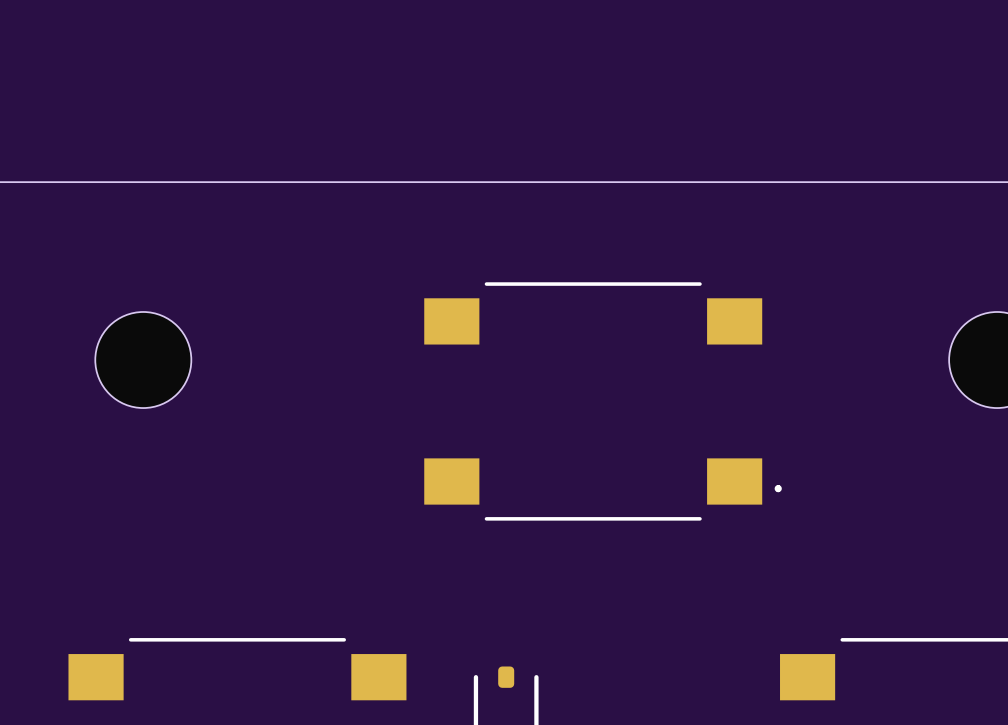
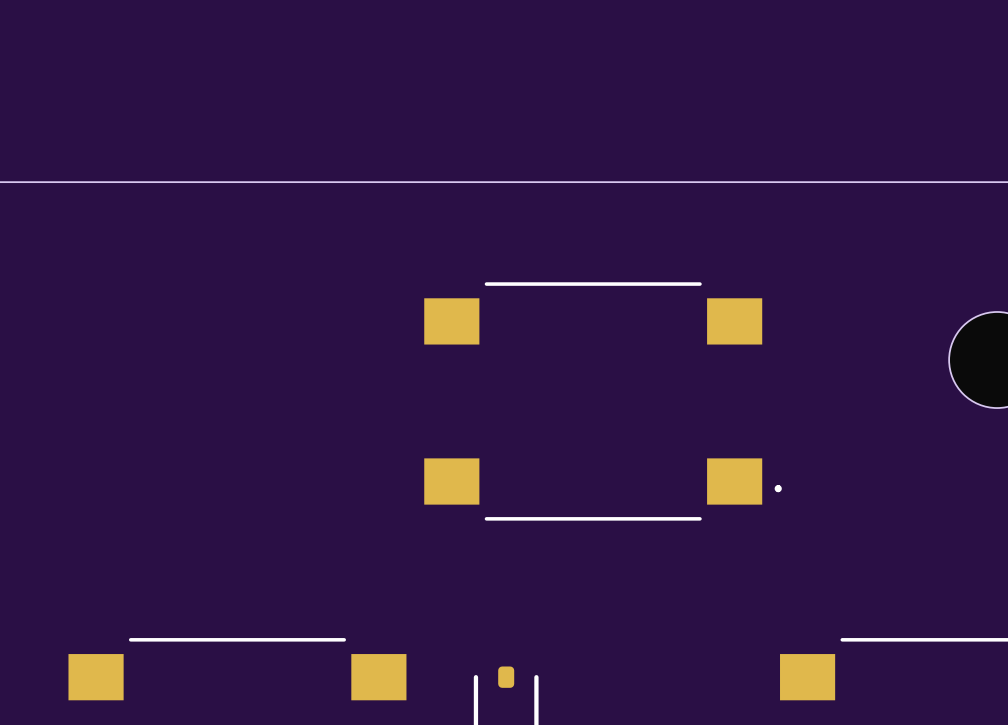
part: (143, 360) -> none

